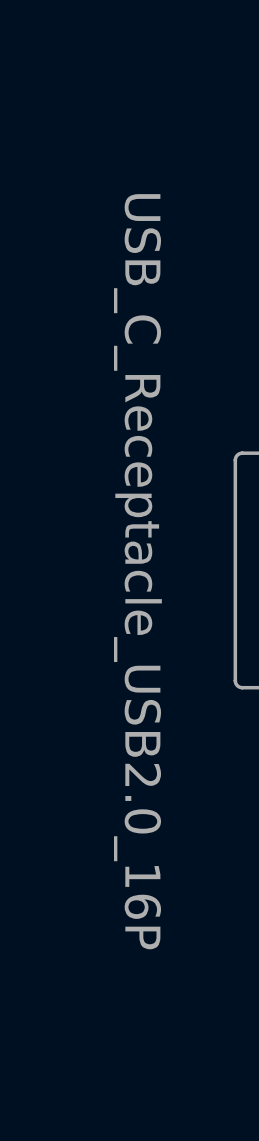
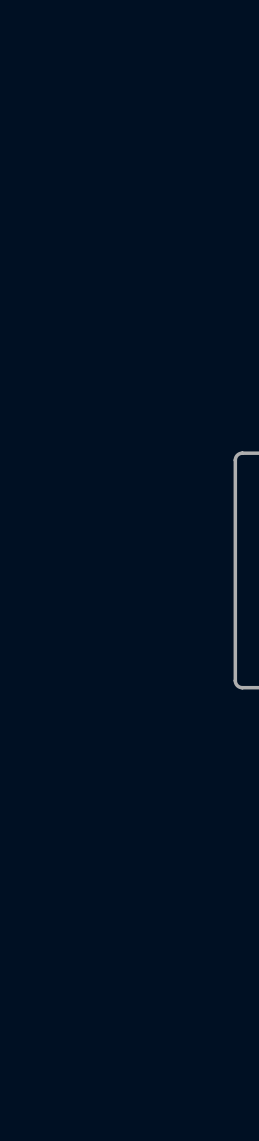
part value: USB_C_Receptacle_USB2.0_16P (137, 571) -> none

